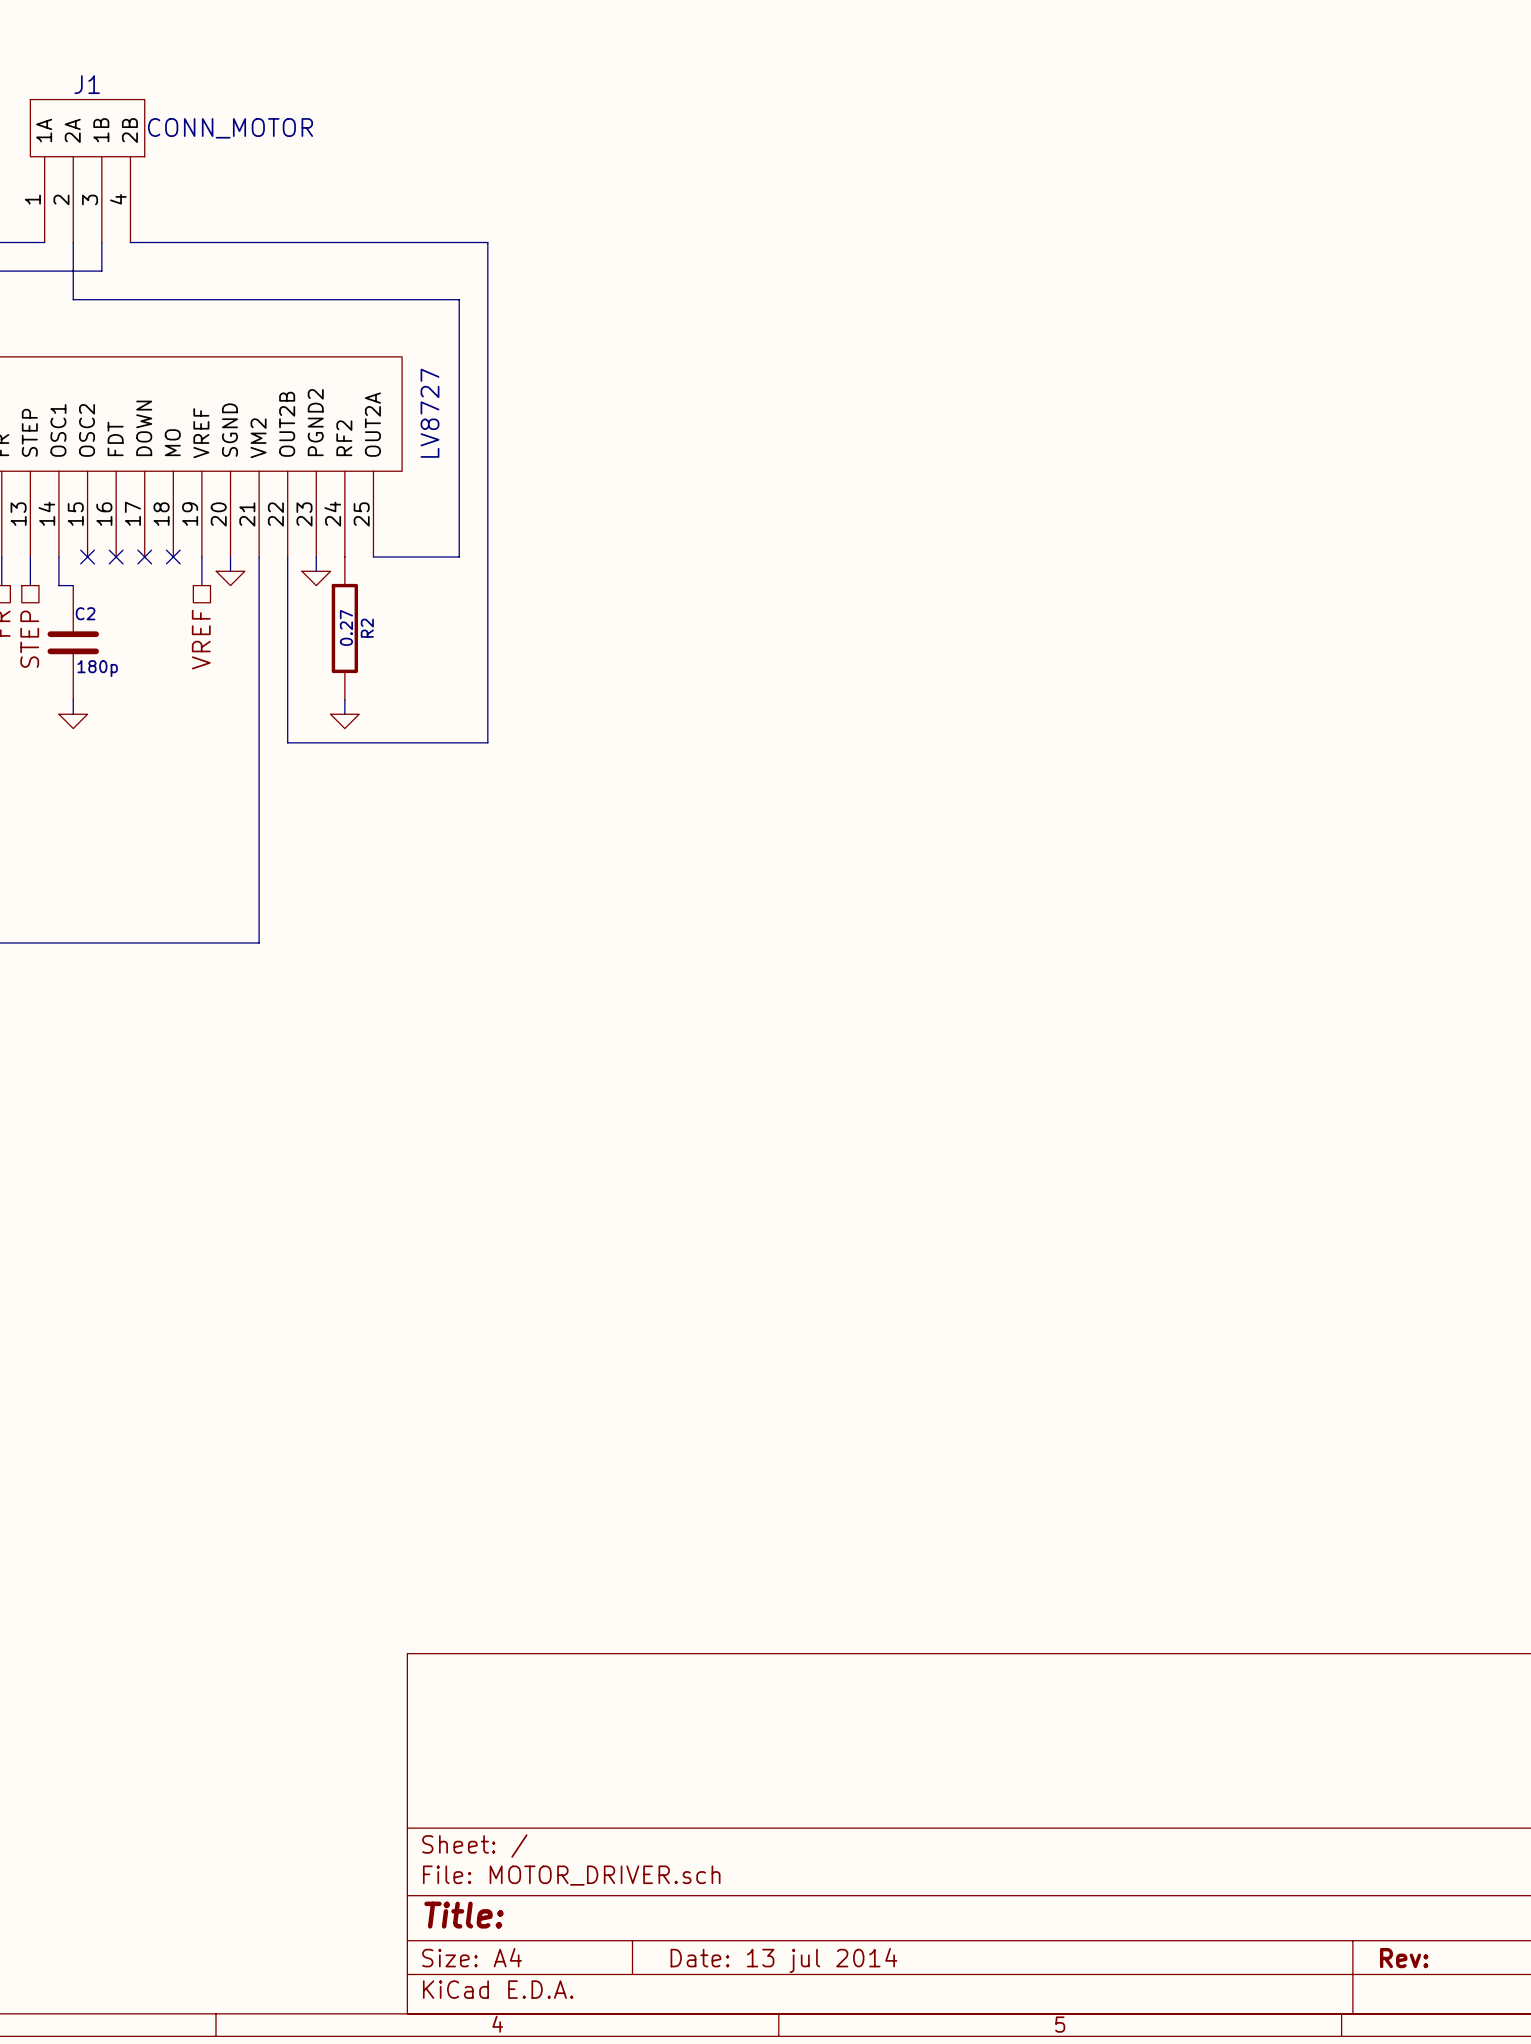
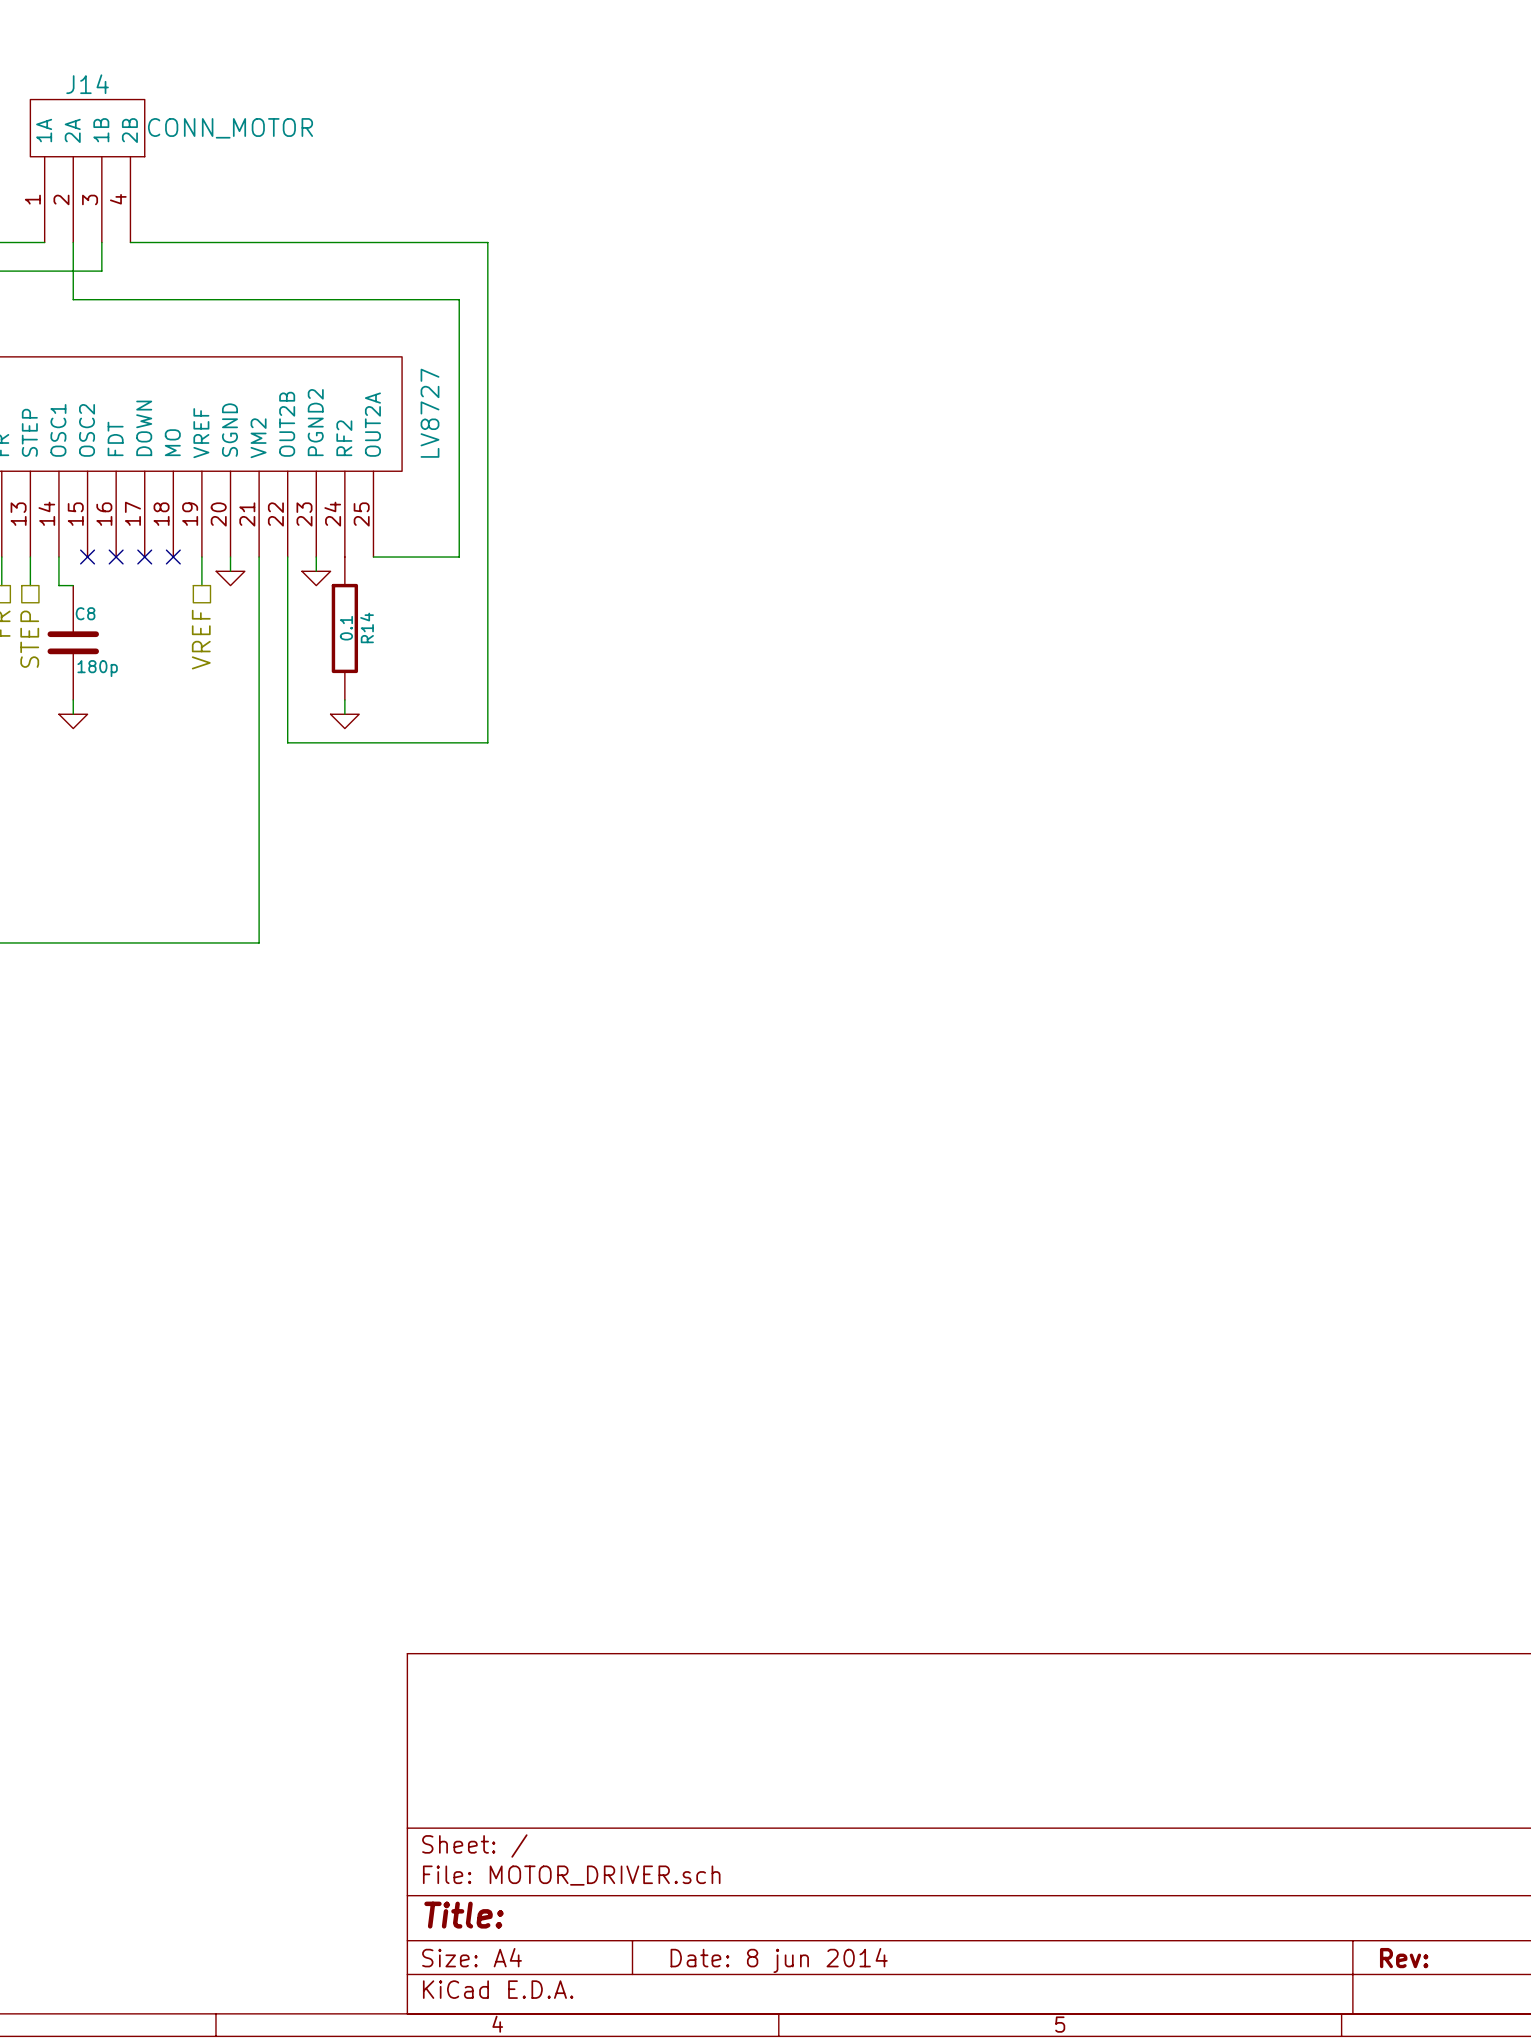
J1 name: J1 (87, 84) -> J14 (87, 84)
C2 name: C2 (85, 613) -> C8 (85, 613)
R2 value: 0.27 (346, 627) -> 0.1 (346, 628)
R2 name: R2 (367, 628) -> R14 (367, 627)
title block: Date: 13 jul 2014 (783, 1960) -> Date: 8 jun 2014 (779, 1960)

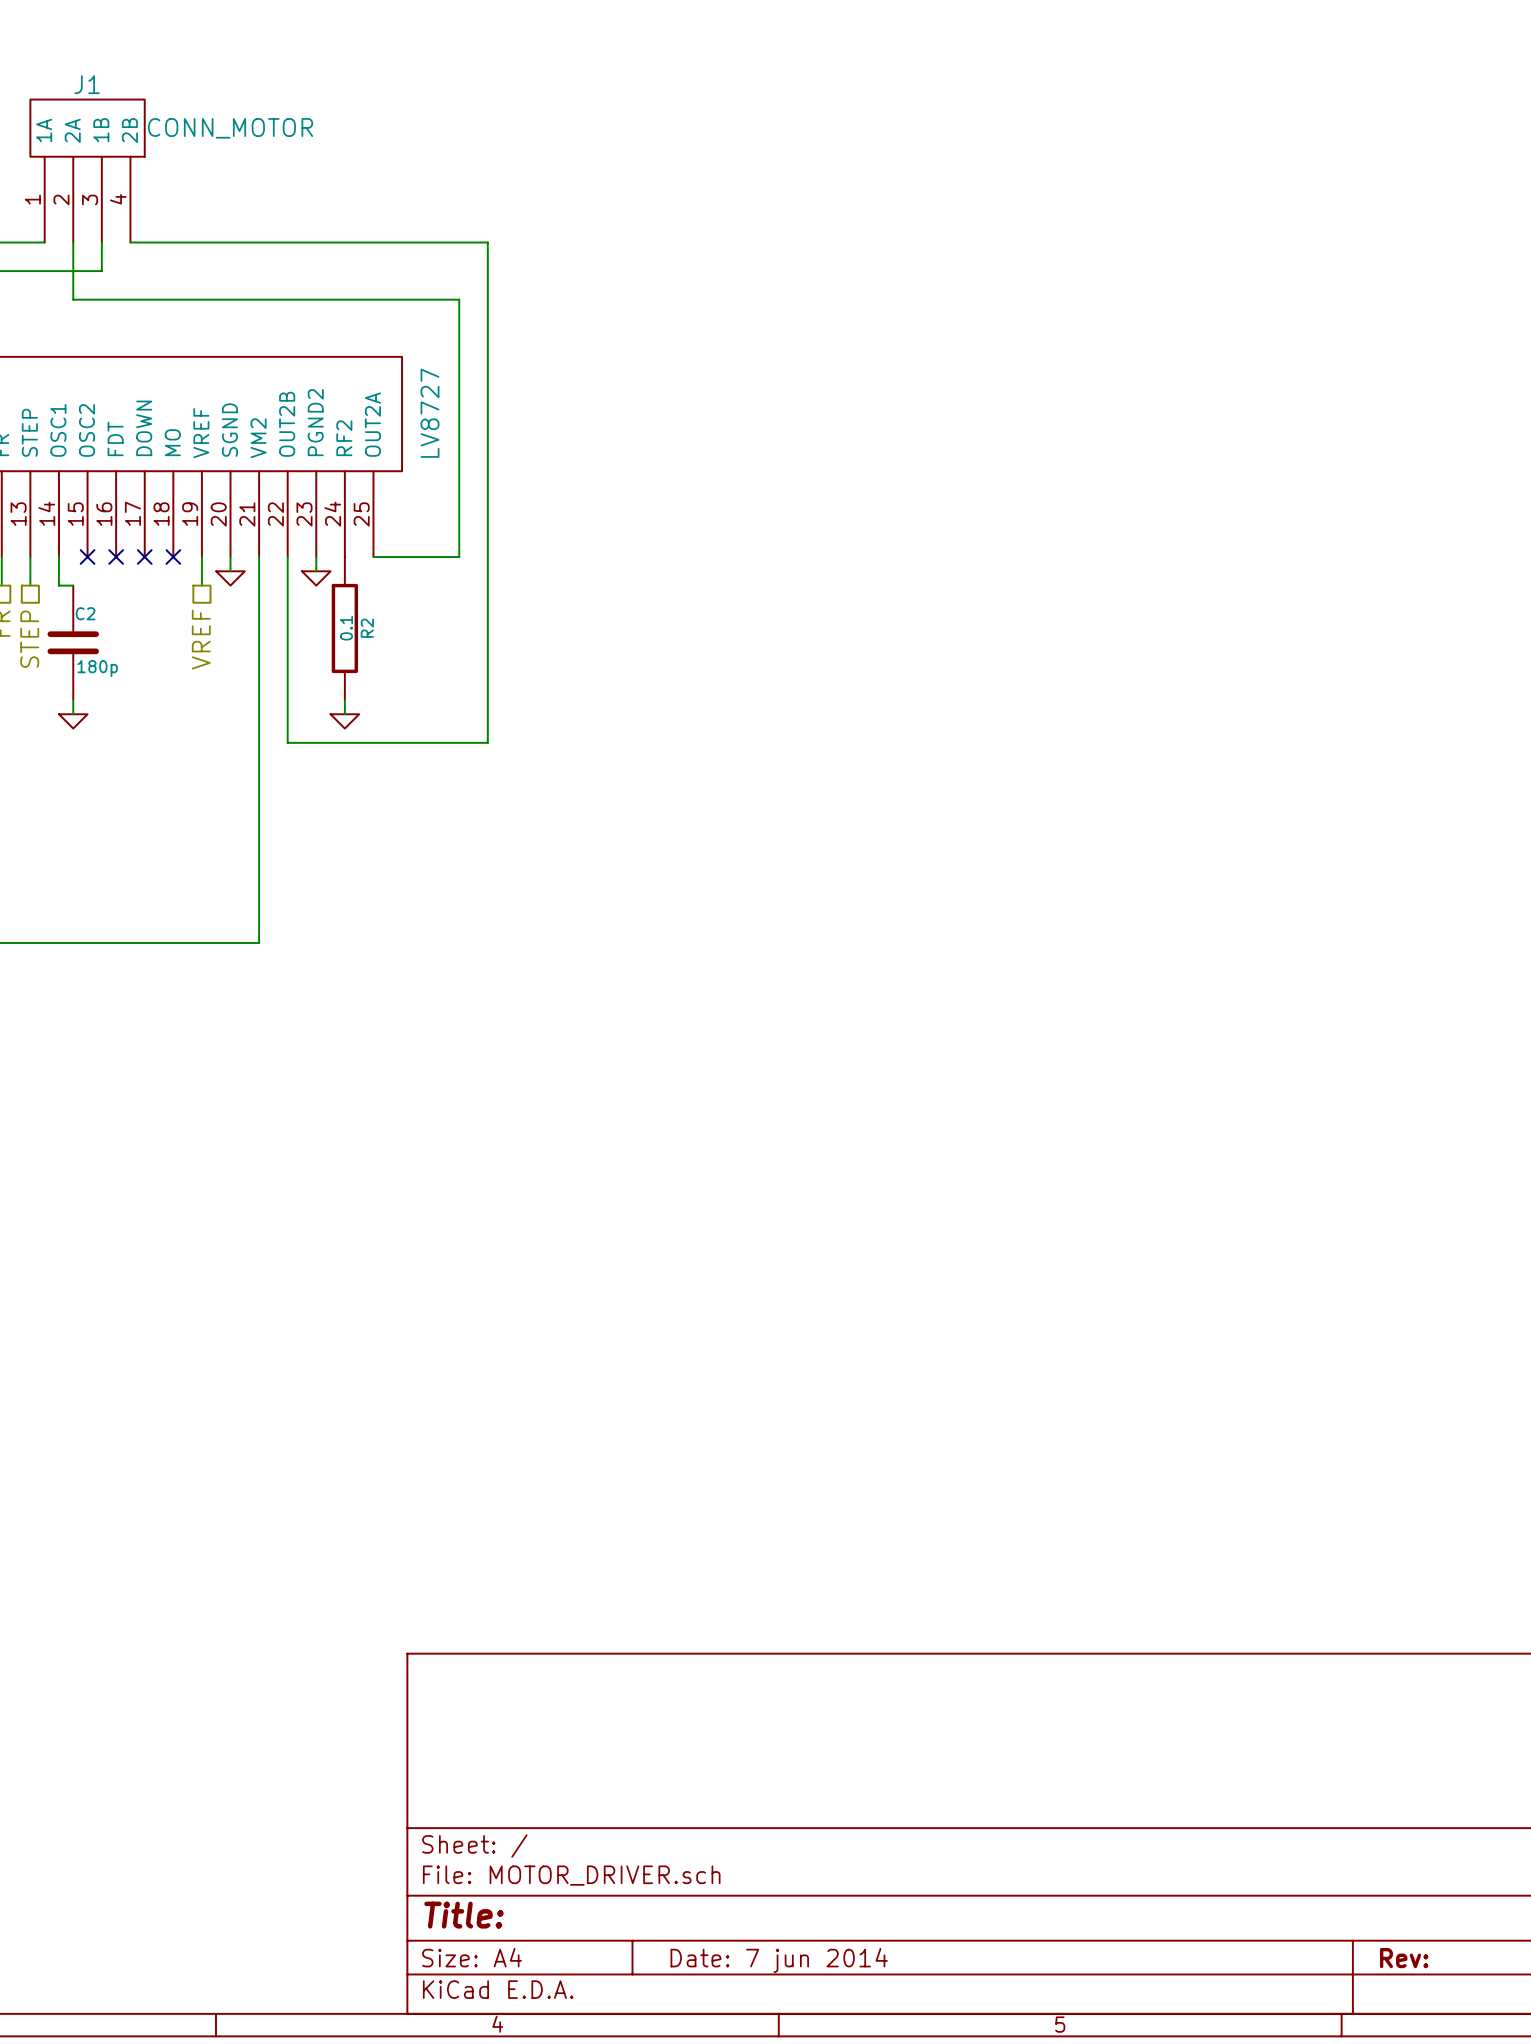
J14 name: J14 (87, 84) -> J1 (87, 84)
C8 name: C8 (85, 613) -> C2 (85, 613)
R14 name: R14 (367, 627) -> R2 (367, 628)
title block: Date: 8 jun 2014 (779, 1960) -> Date: 7 jun 2014 (779, 1960)

